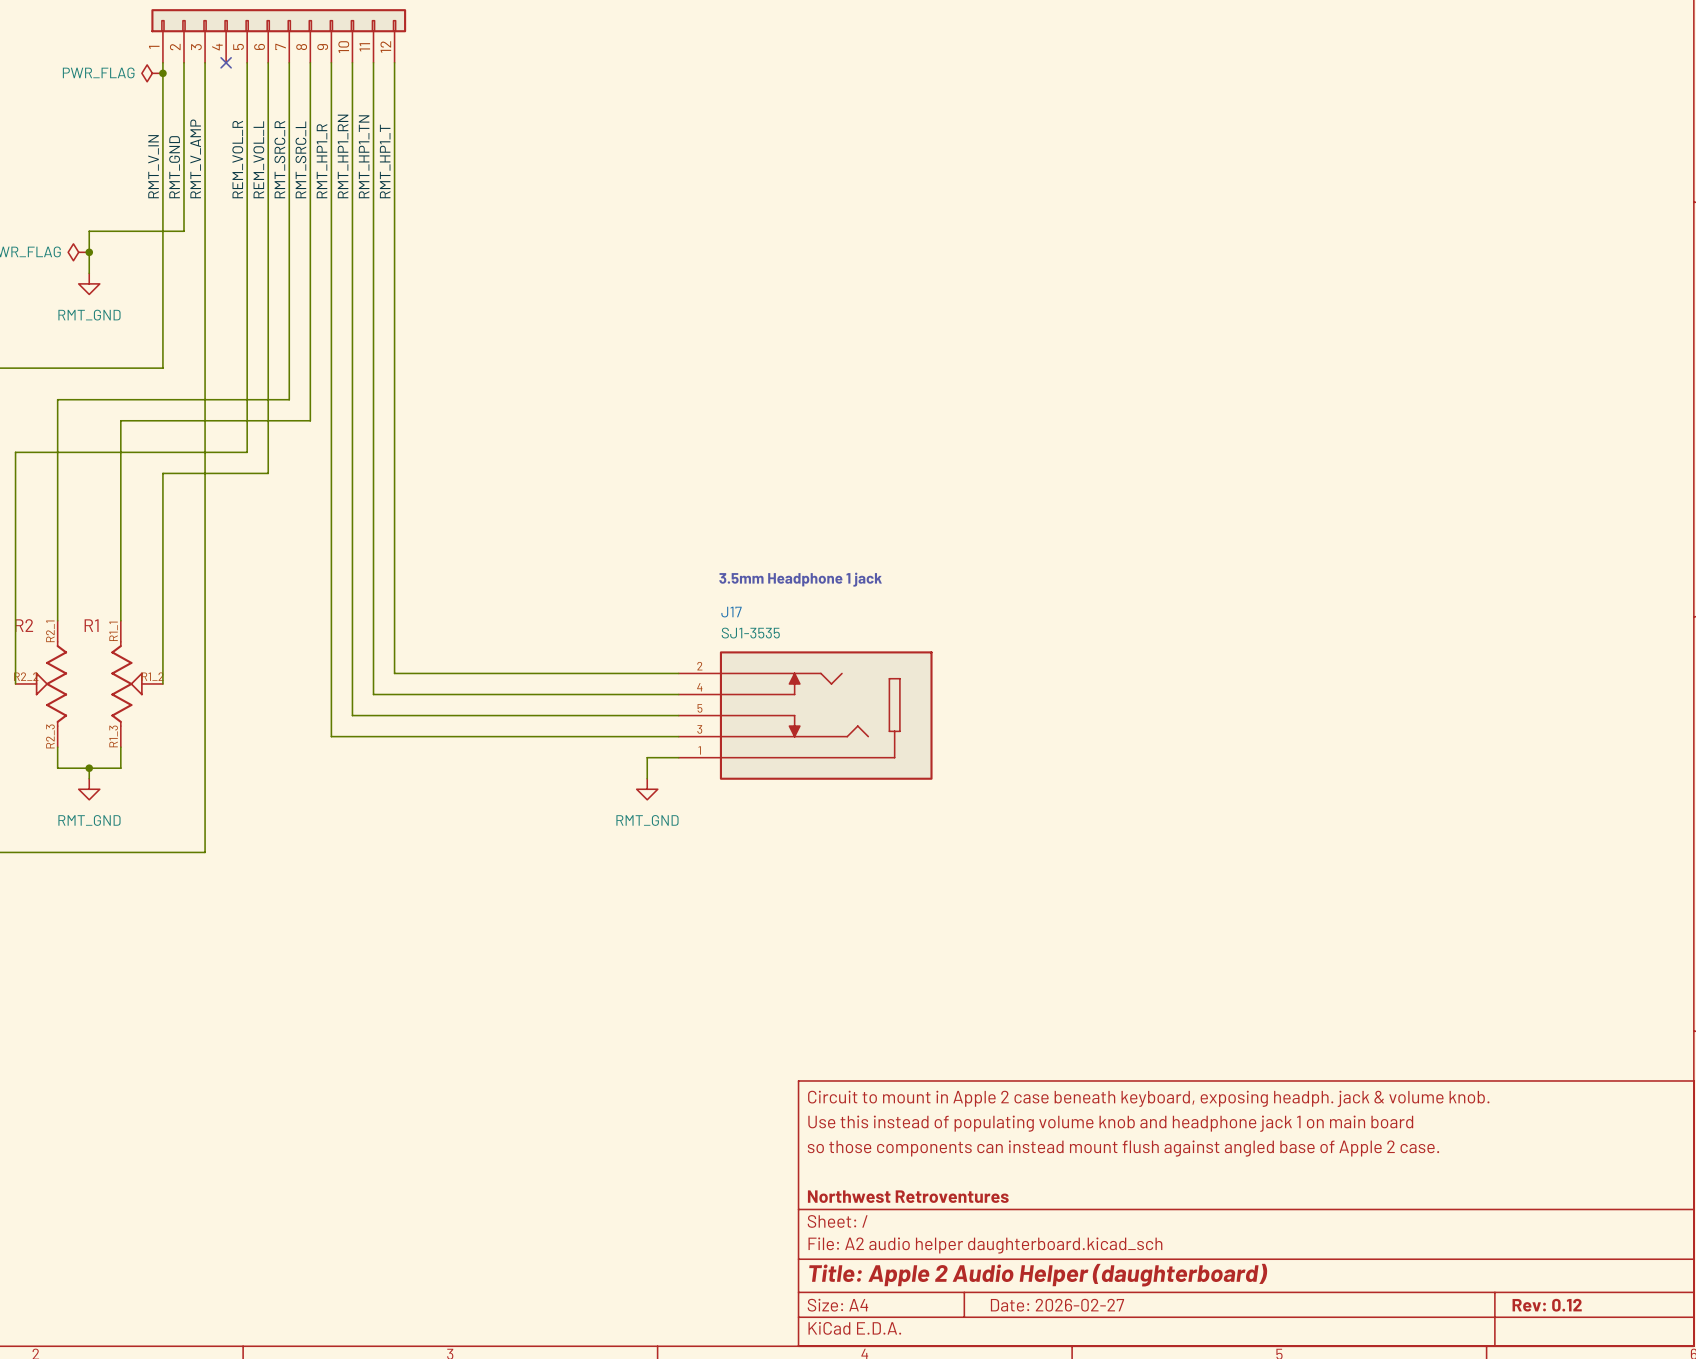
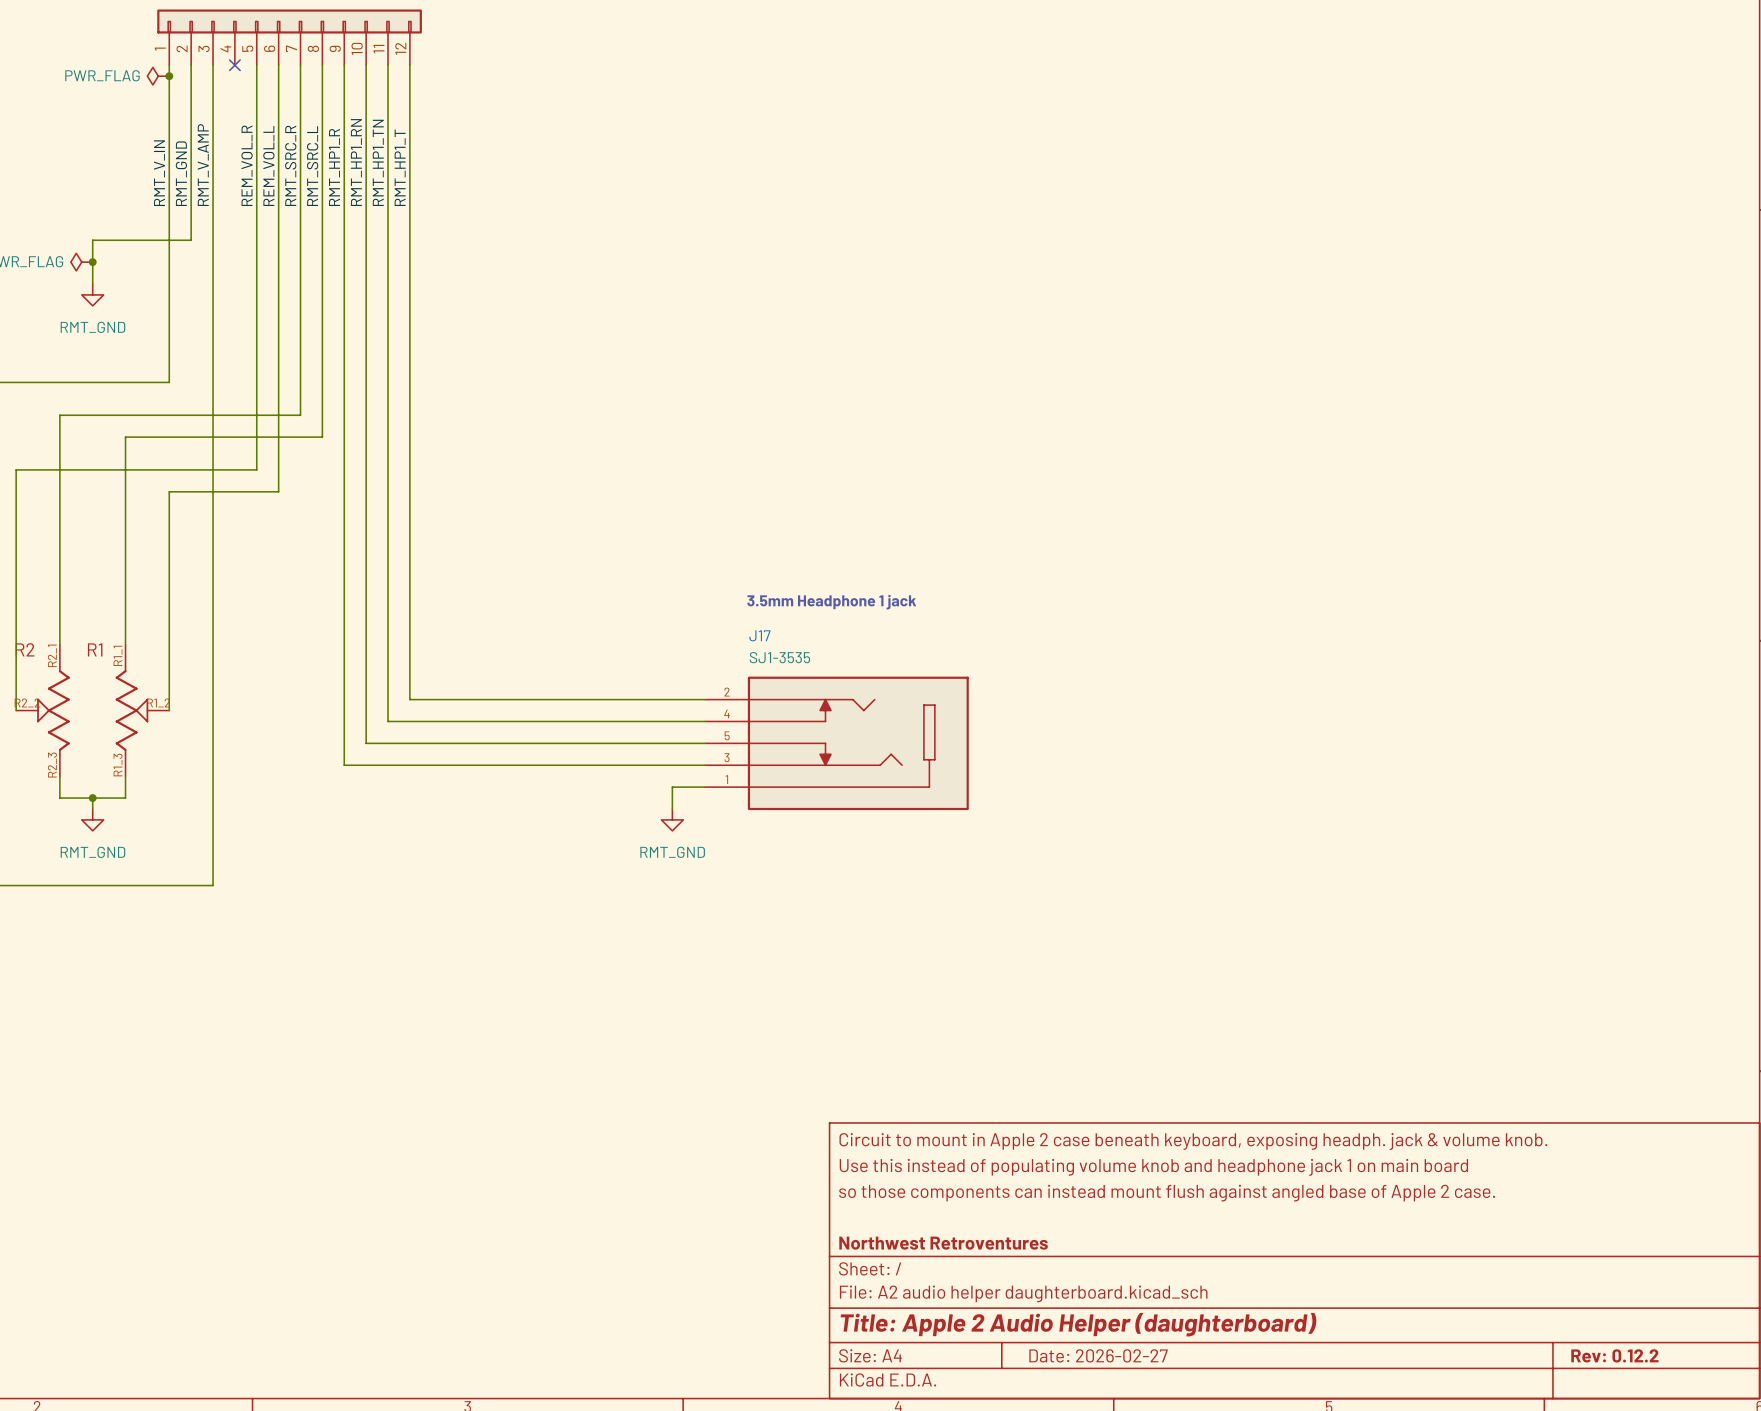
title block: Rev: 0.12 (1547, 1305) -> Rev: 0.12.2 (1614, 1355)

